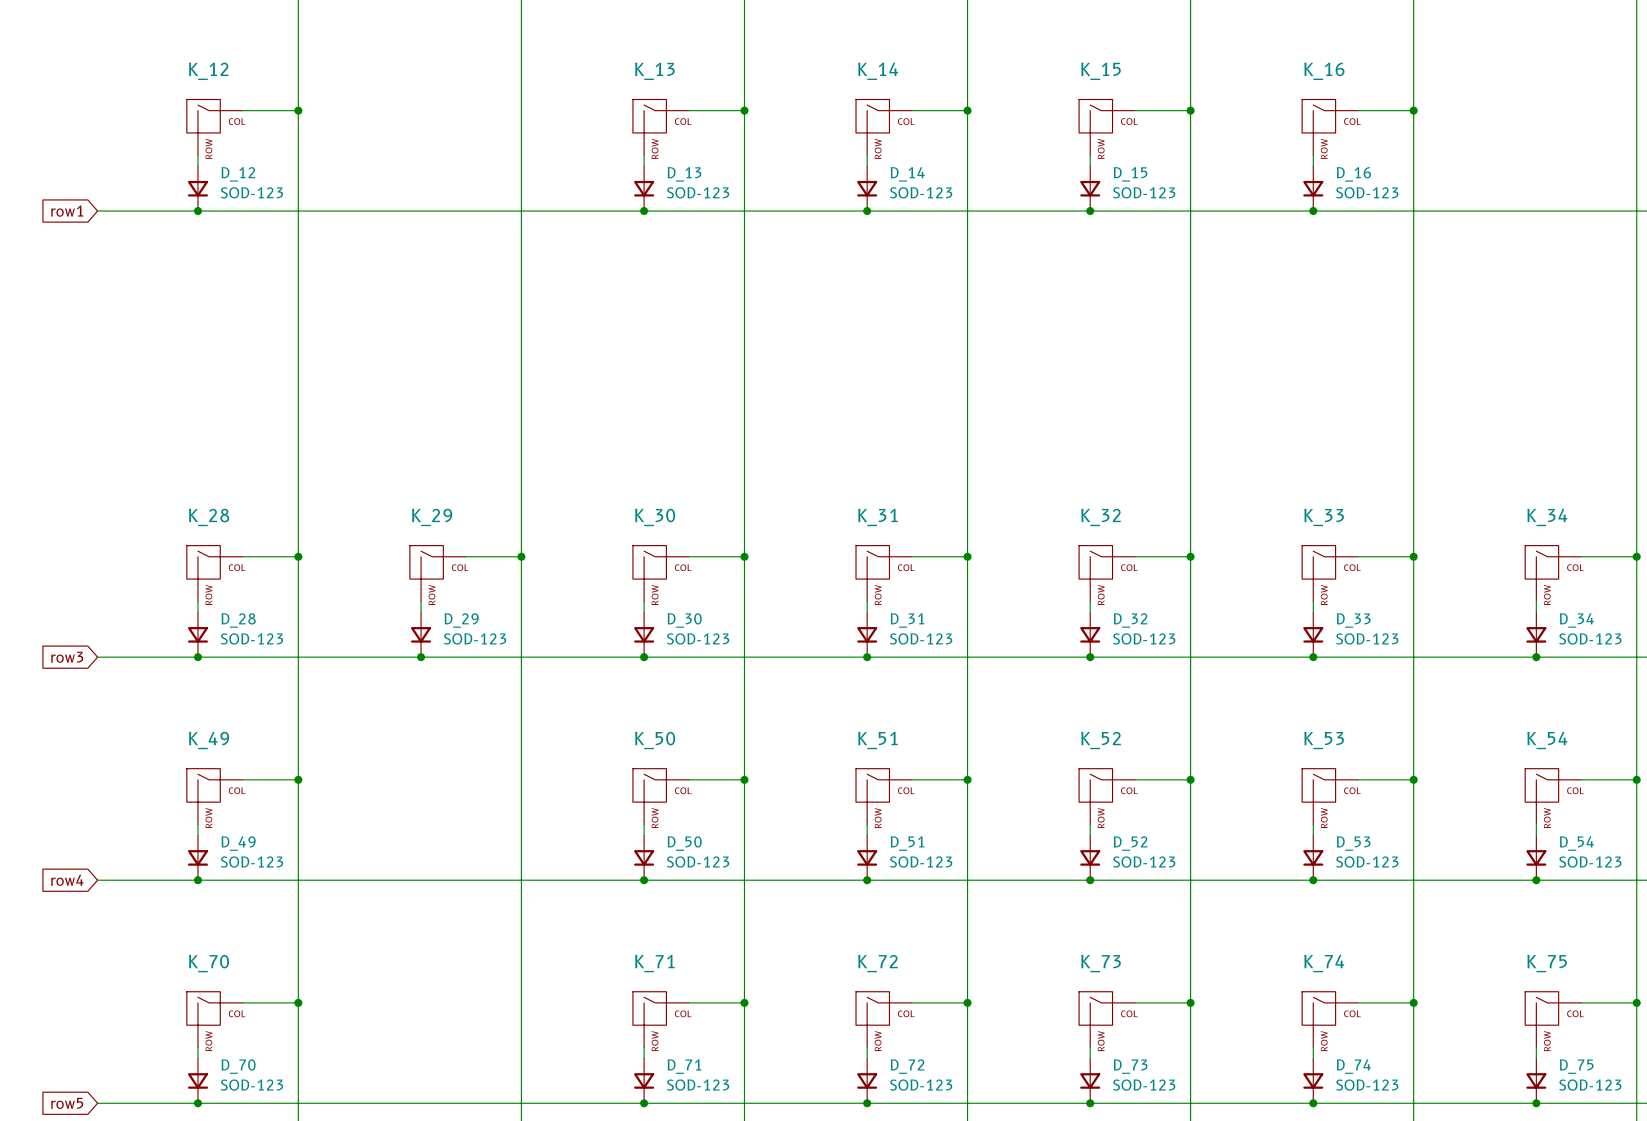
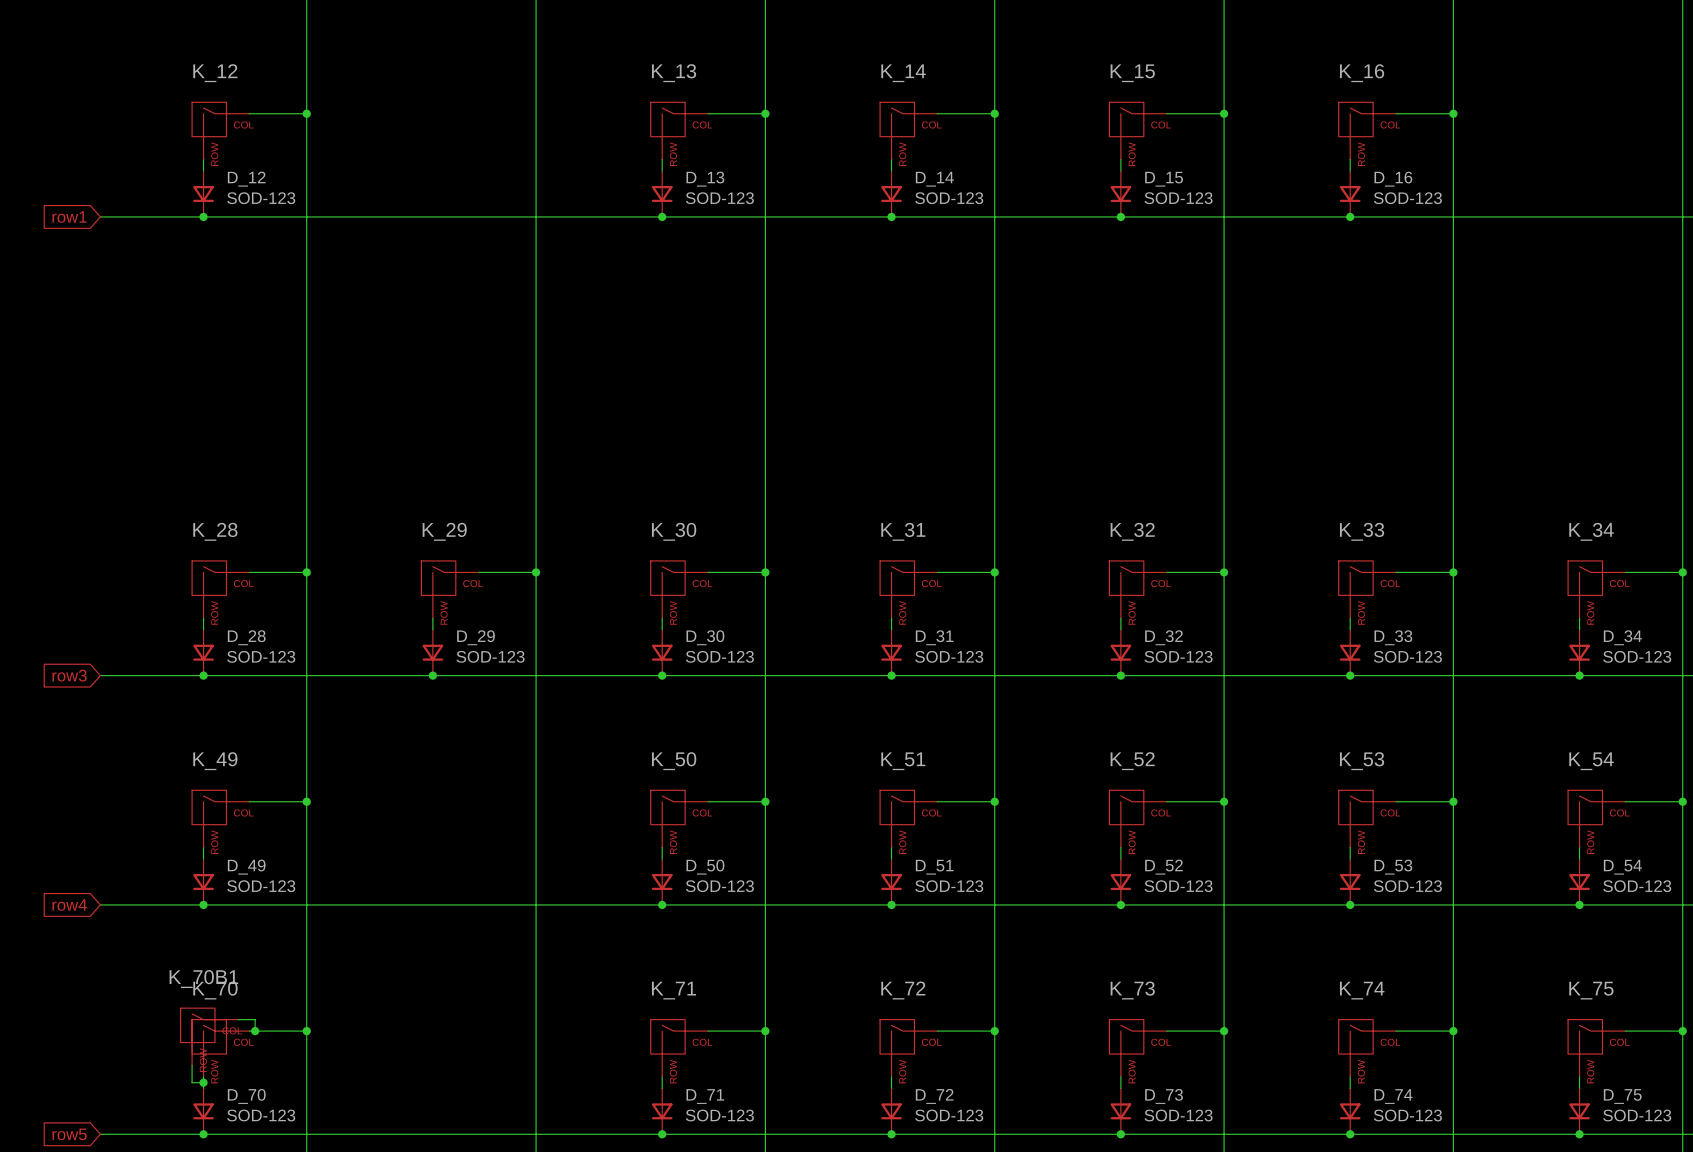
wire: none -> (237, 1019) (255, 1019) (255, 1031)
junction: none -> (255, 1031)
K_70B1: none -> (209, 1036)
wire: none -> (192, 1065) (192, 1082) (203, 1082)
junction: none -> (203, 1082)

